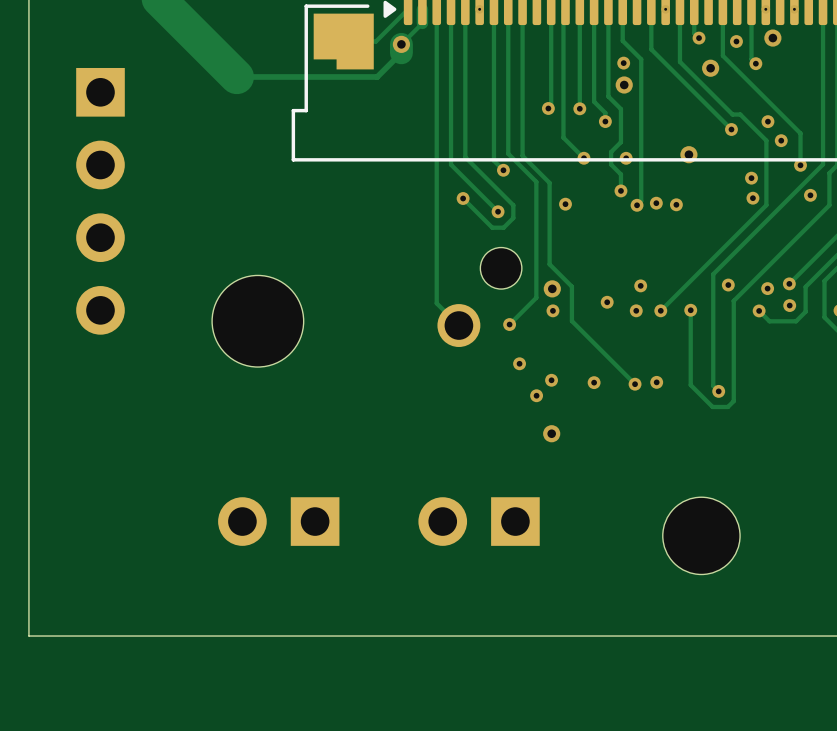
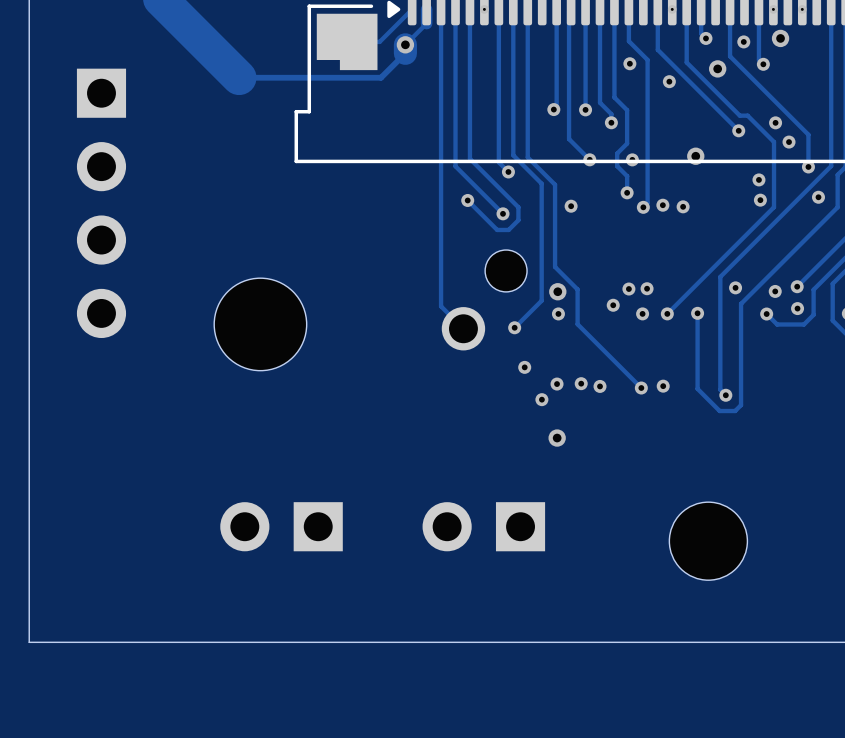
via: none -> (669, 81)
via: (624, 85) -> none
via: none -> (628, 289)
via: none -> (581, 383)

